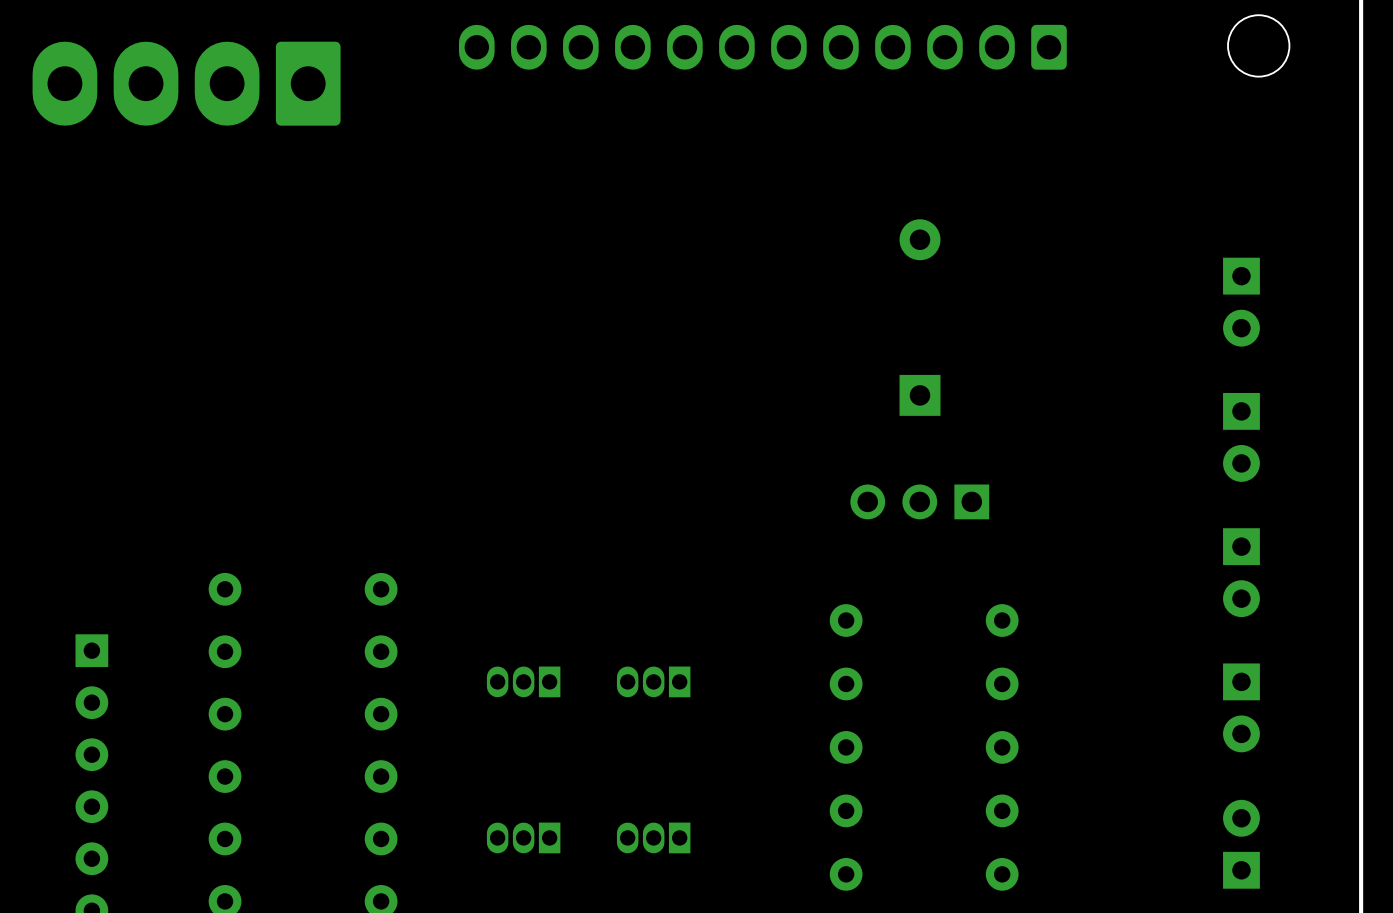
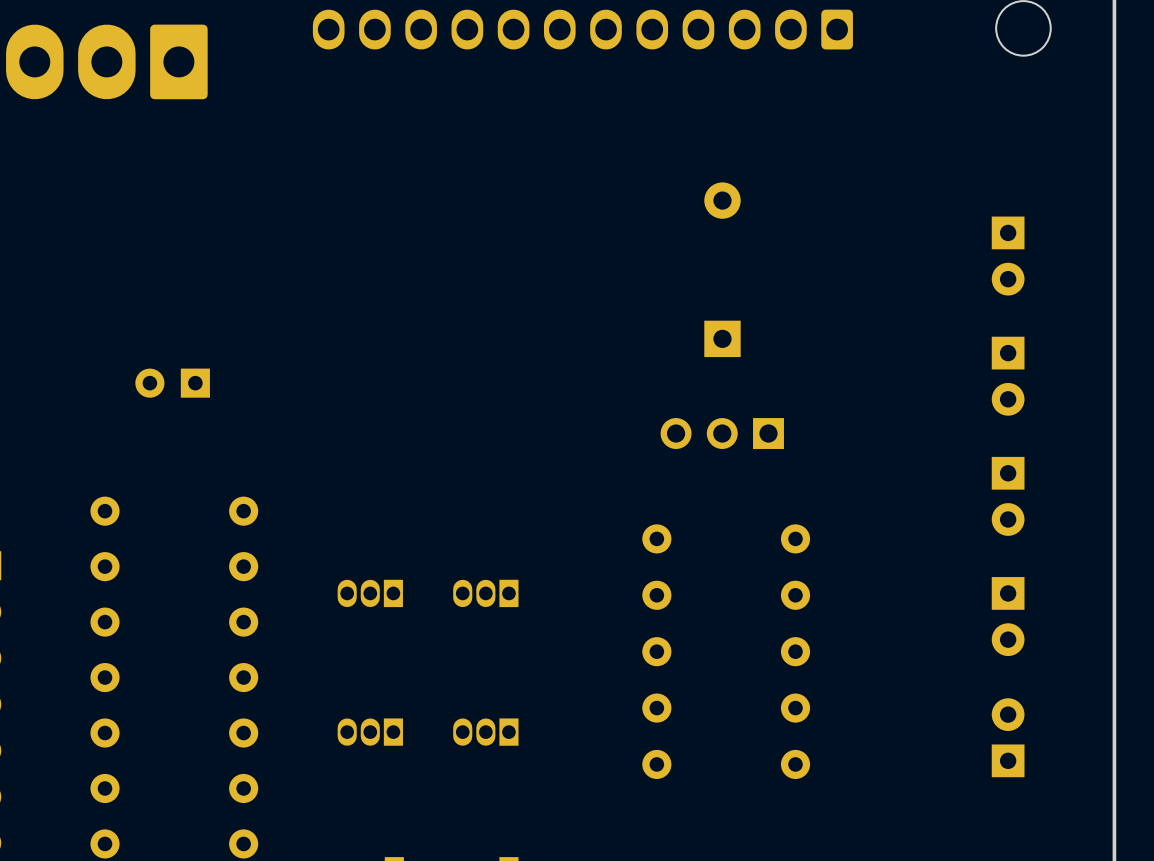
part: none -> (172, 383)

